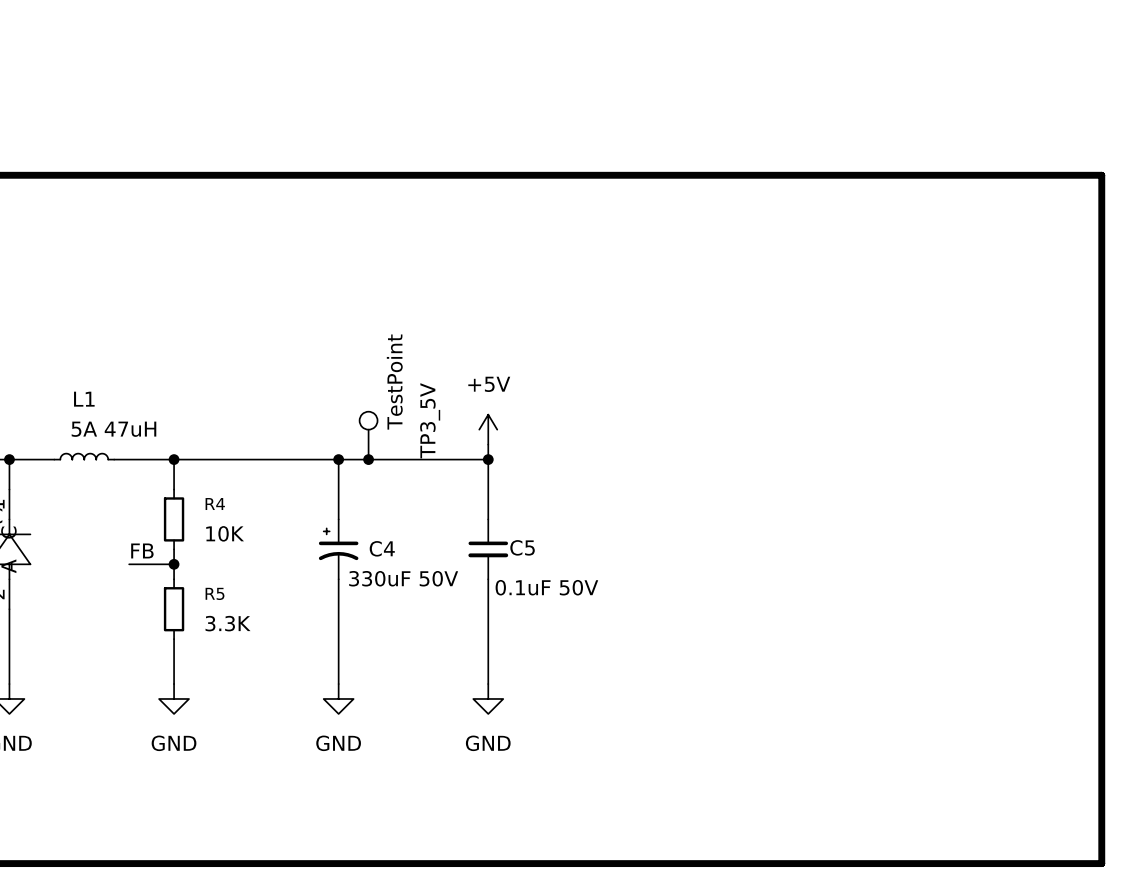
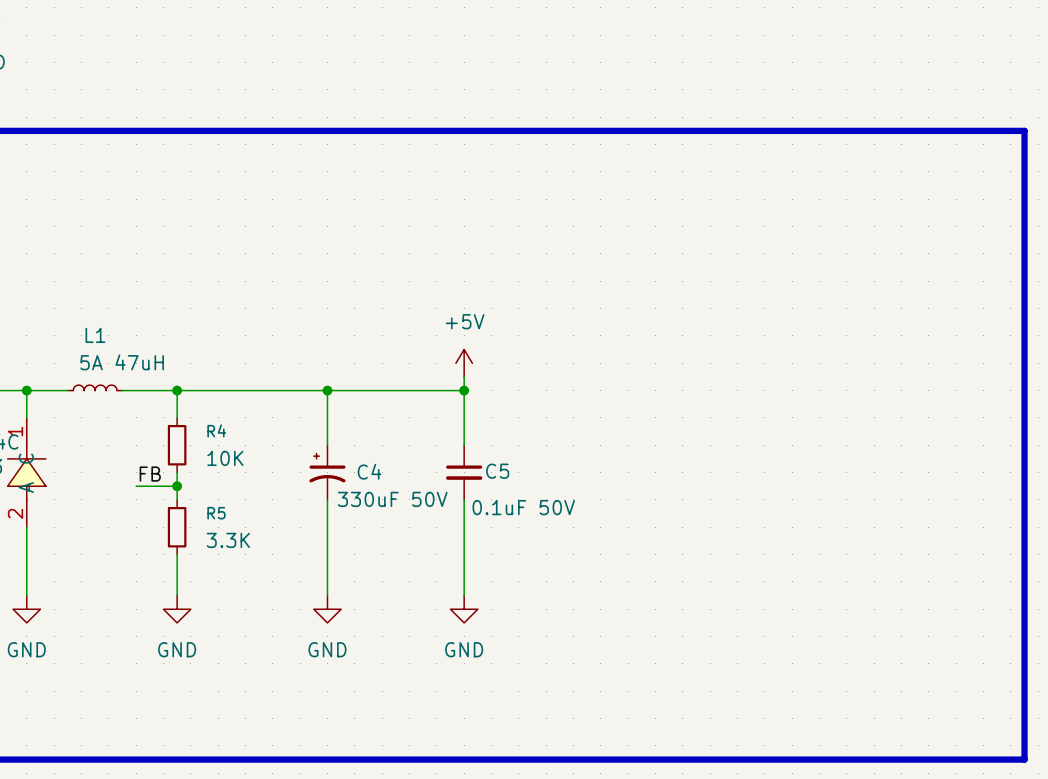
TP3_5V: TestPoint (368, 435) -> none
junction: (368, 459) -> none

